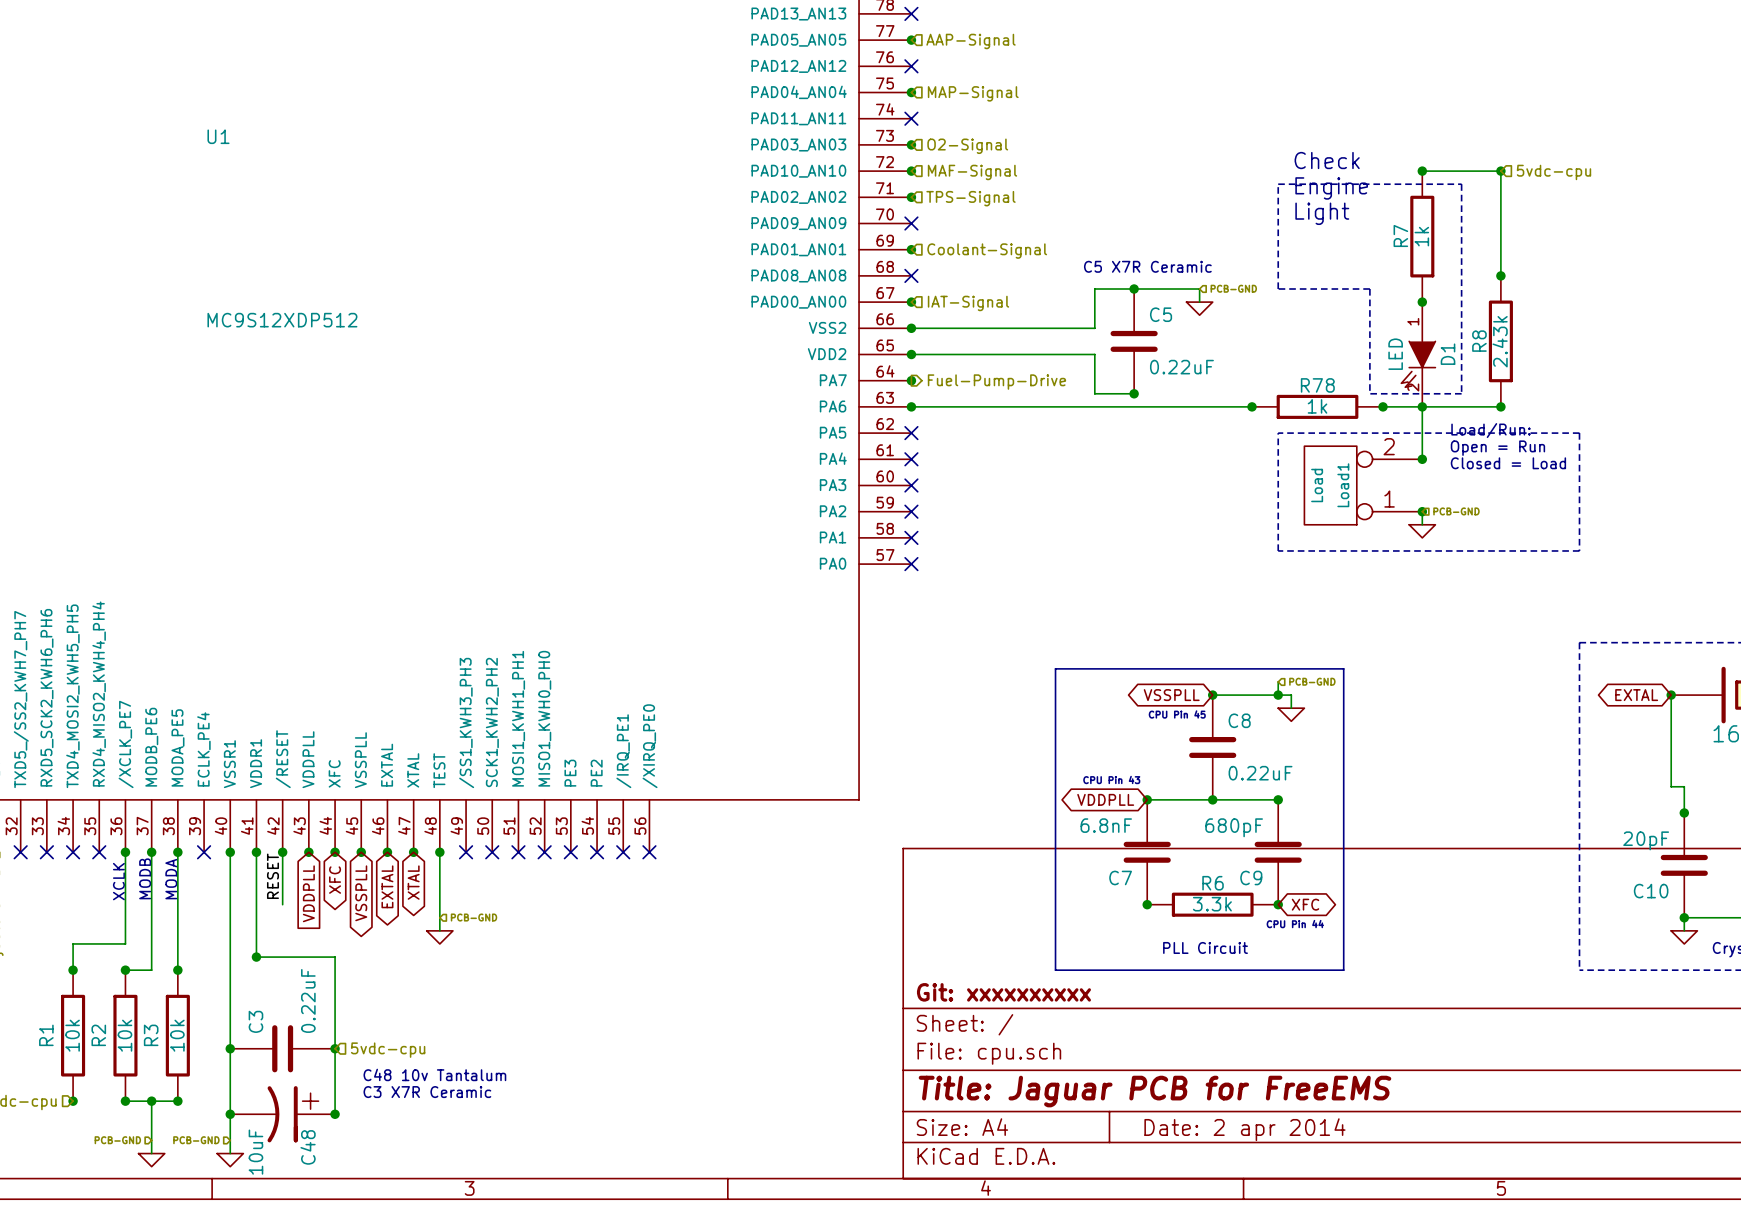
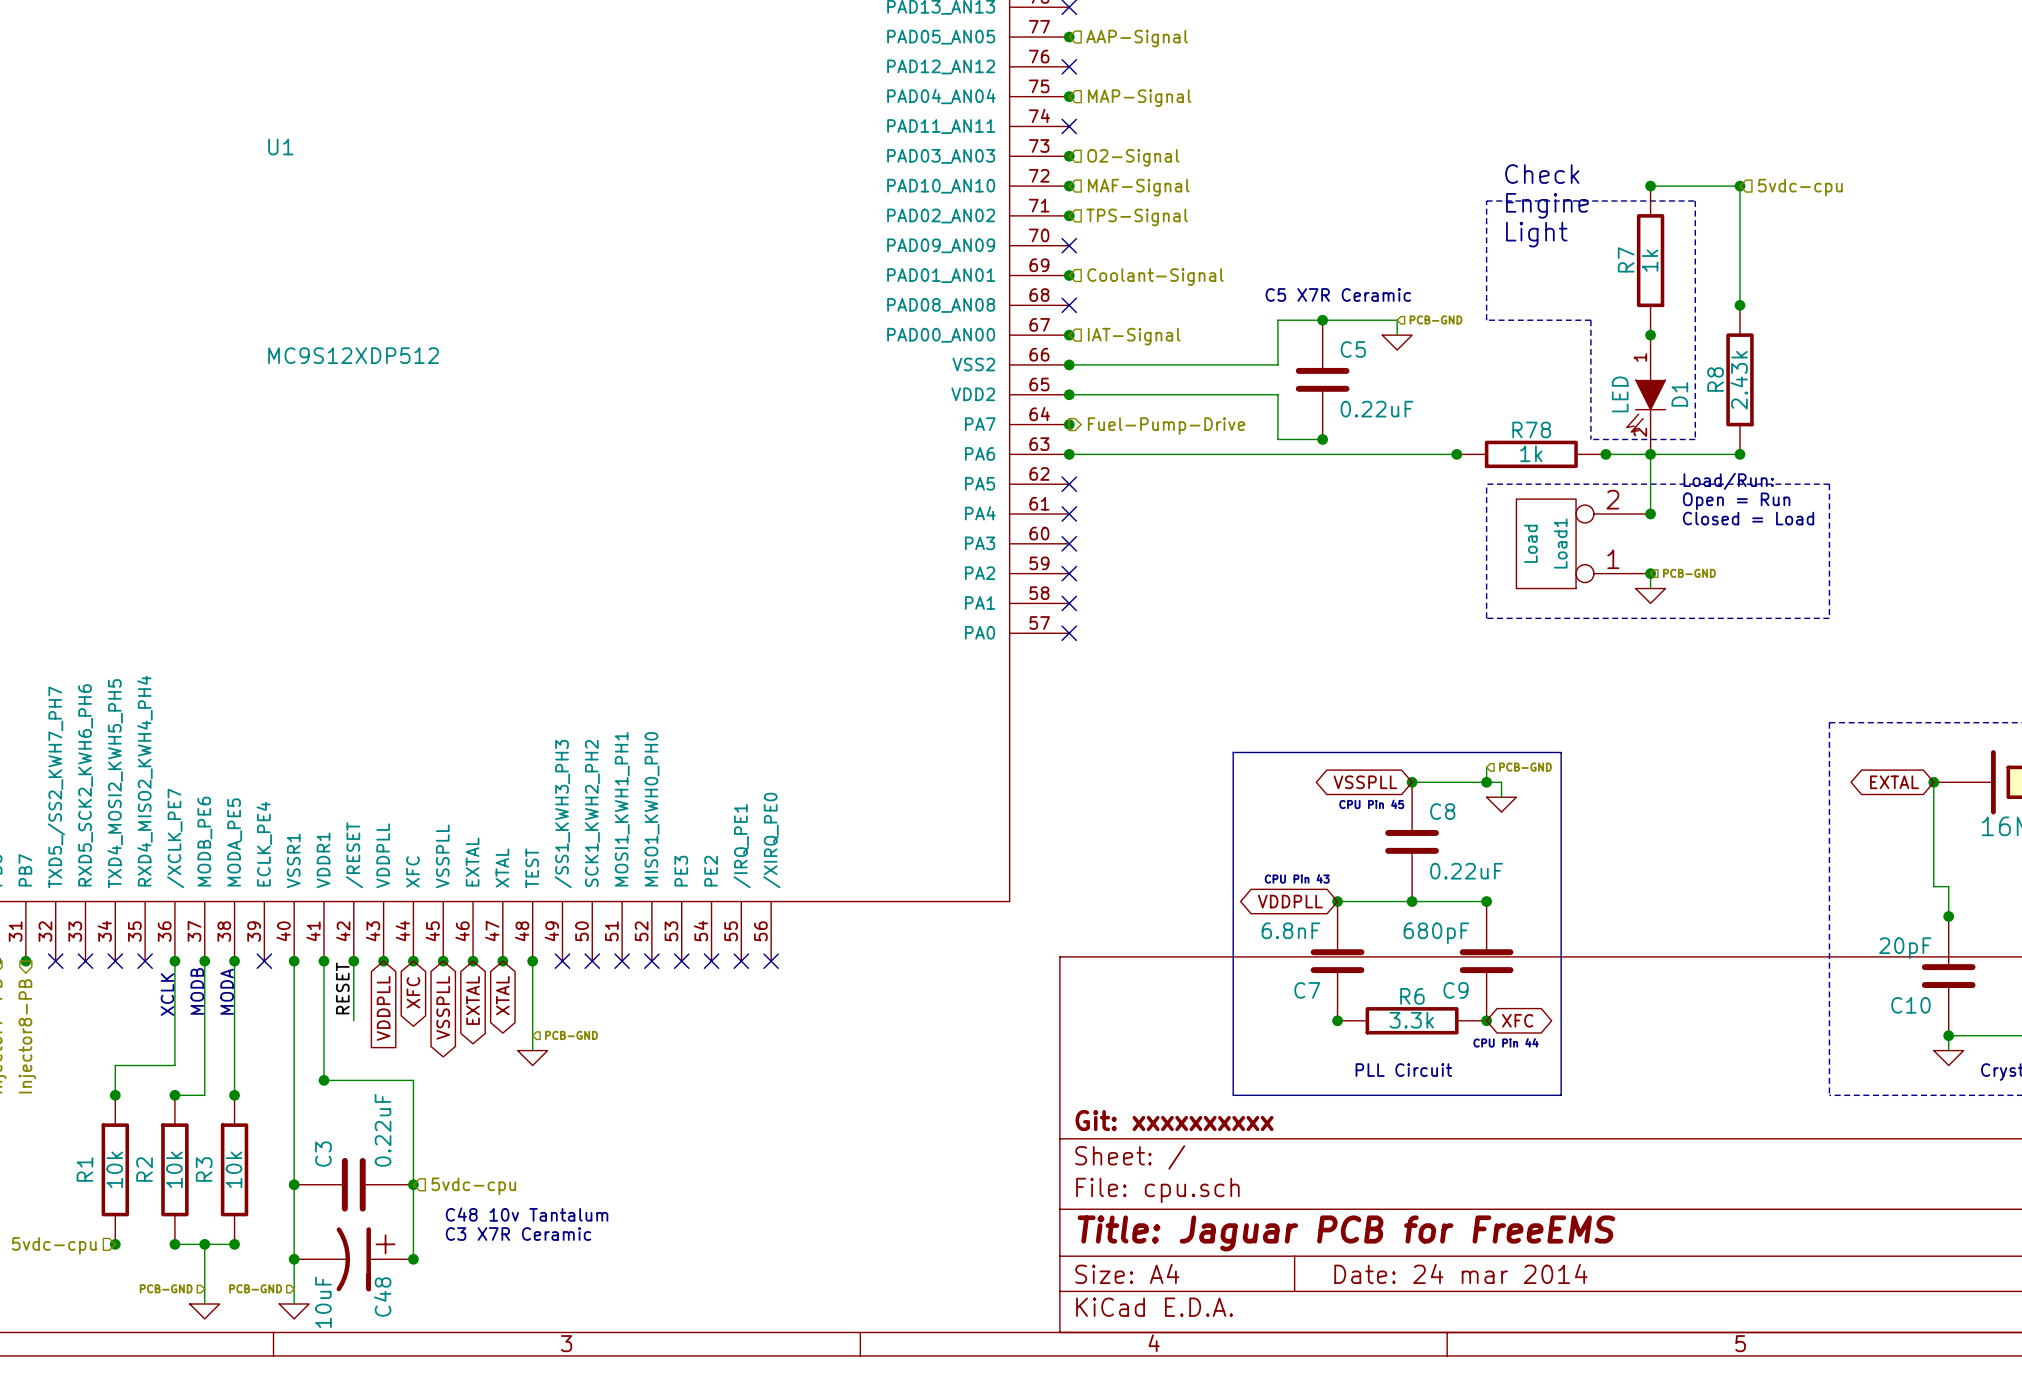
title block: Date: 2 apr 2014 (1244, 1129) -> Date: 24 mar 2014 (1460, 1273)

